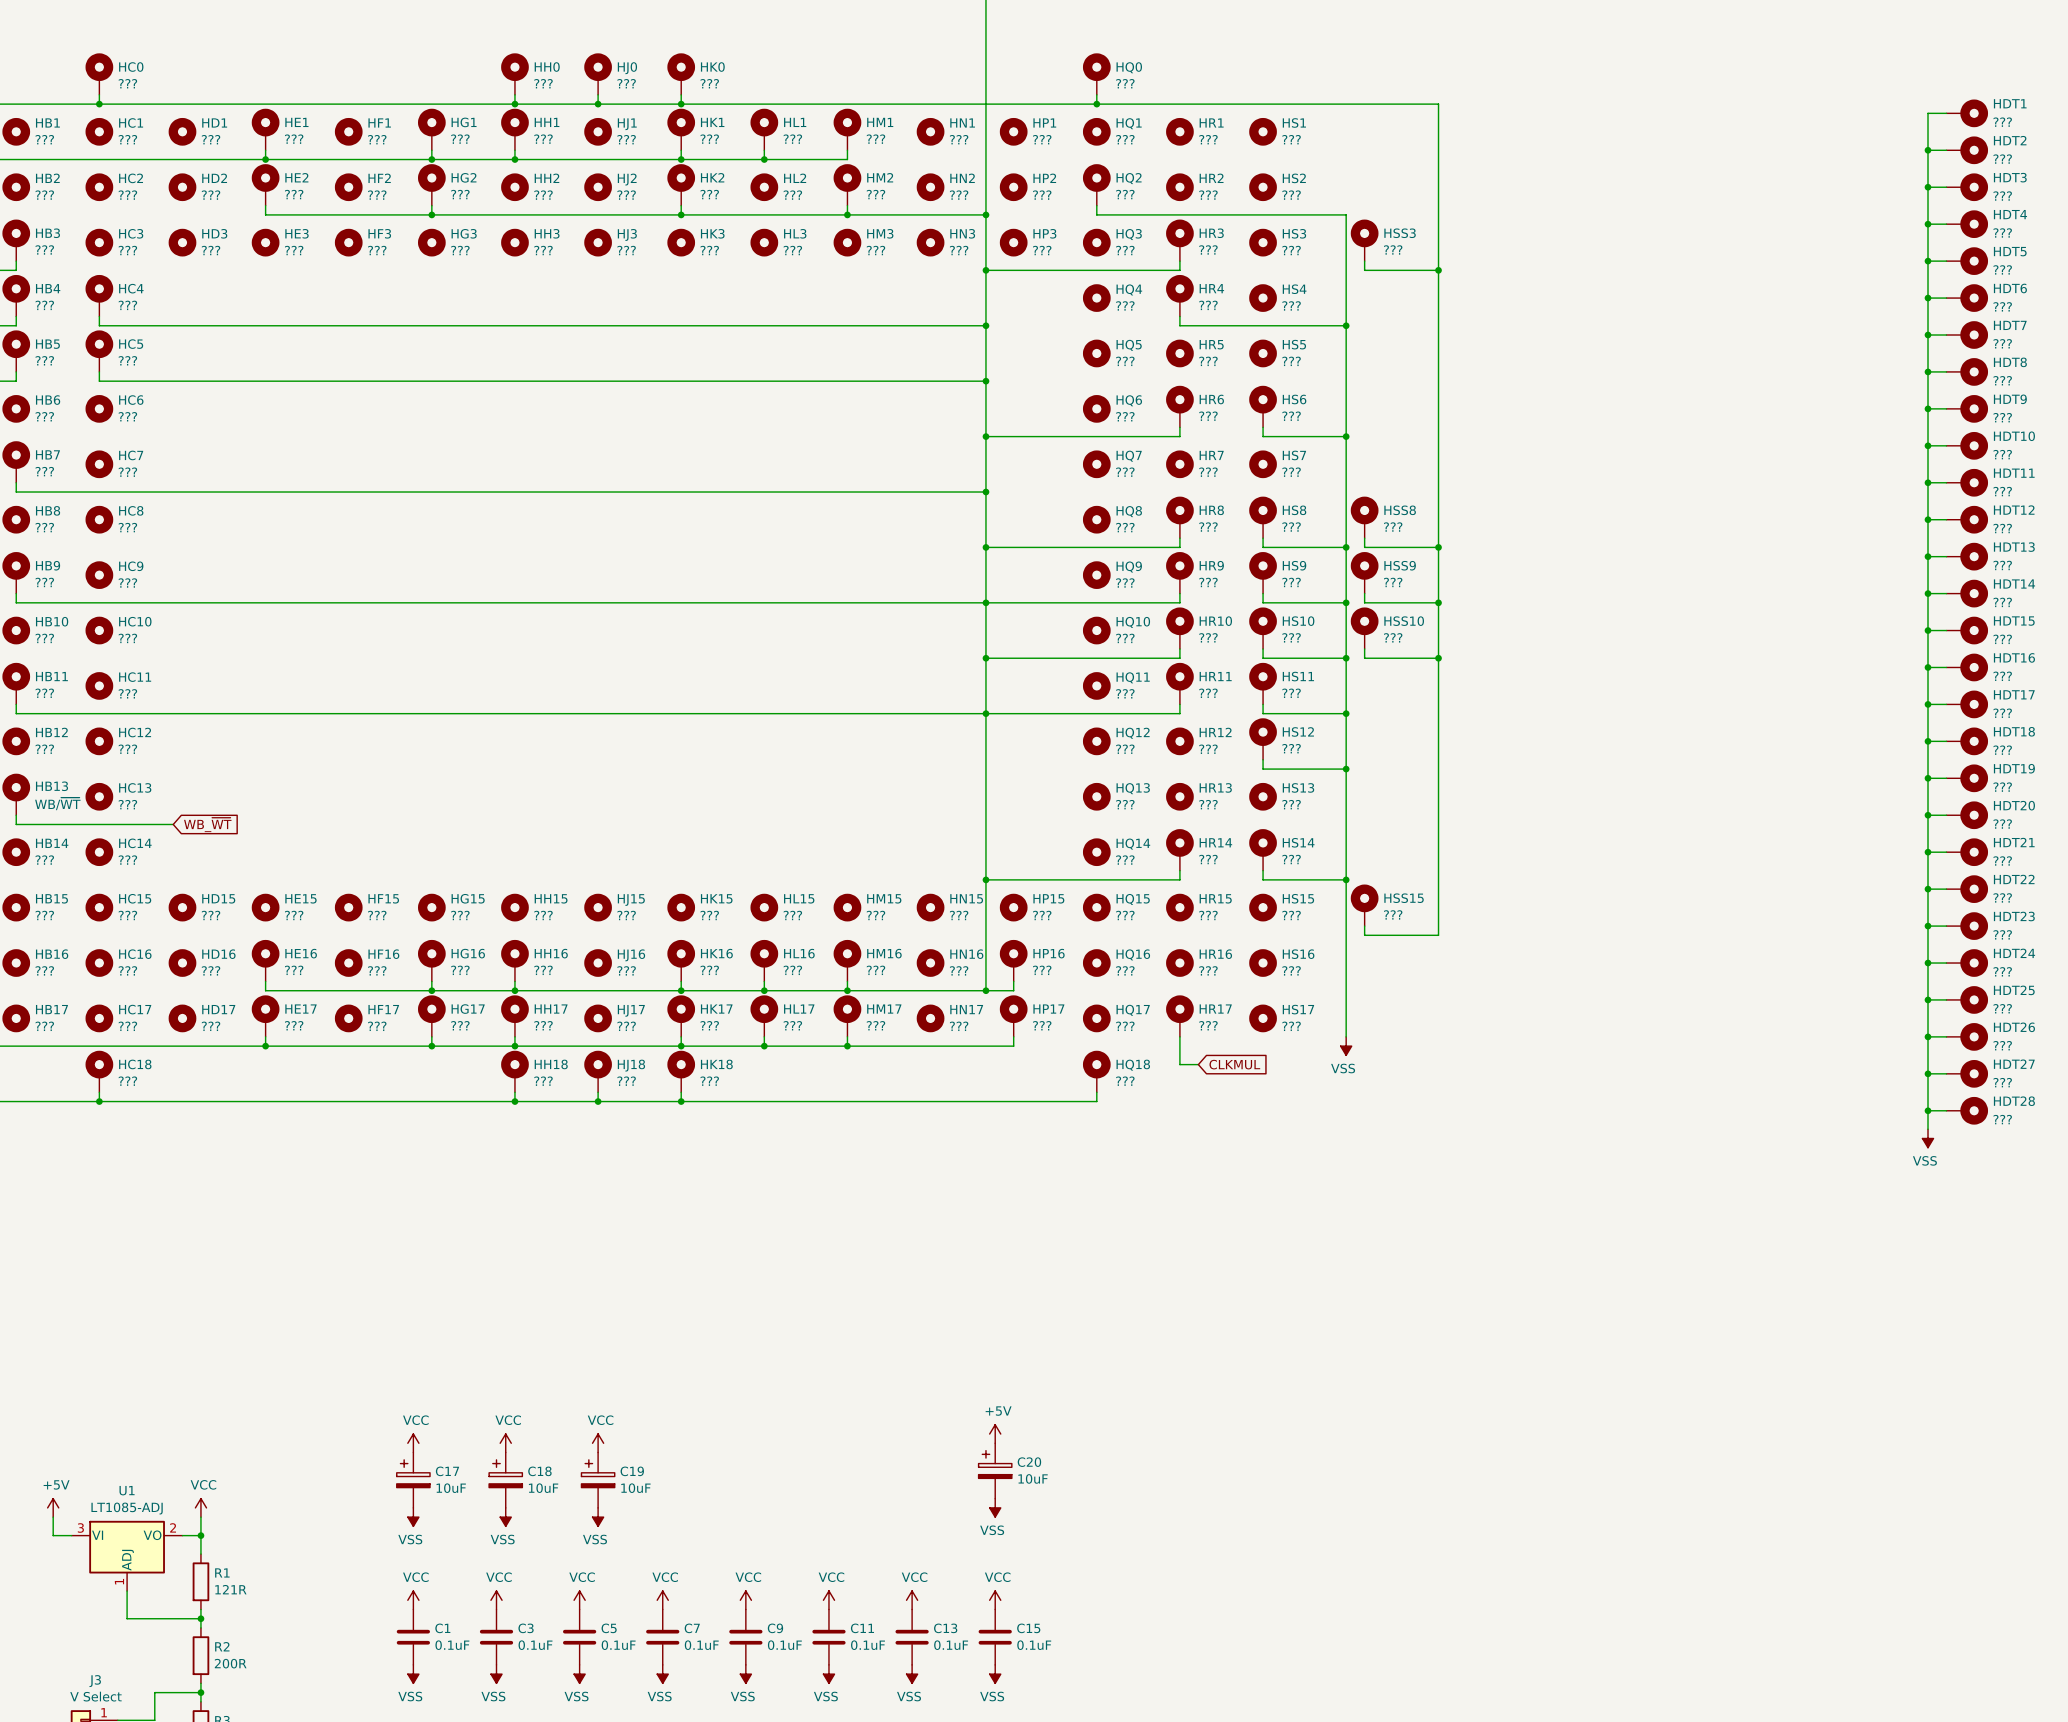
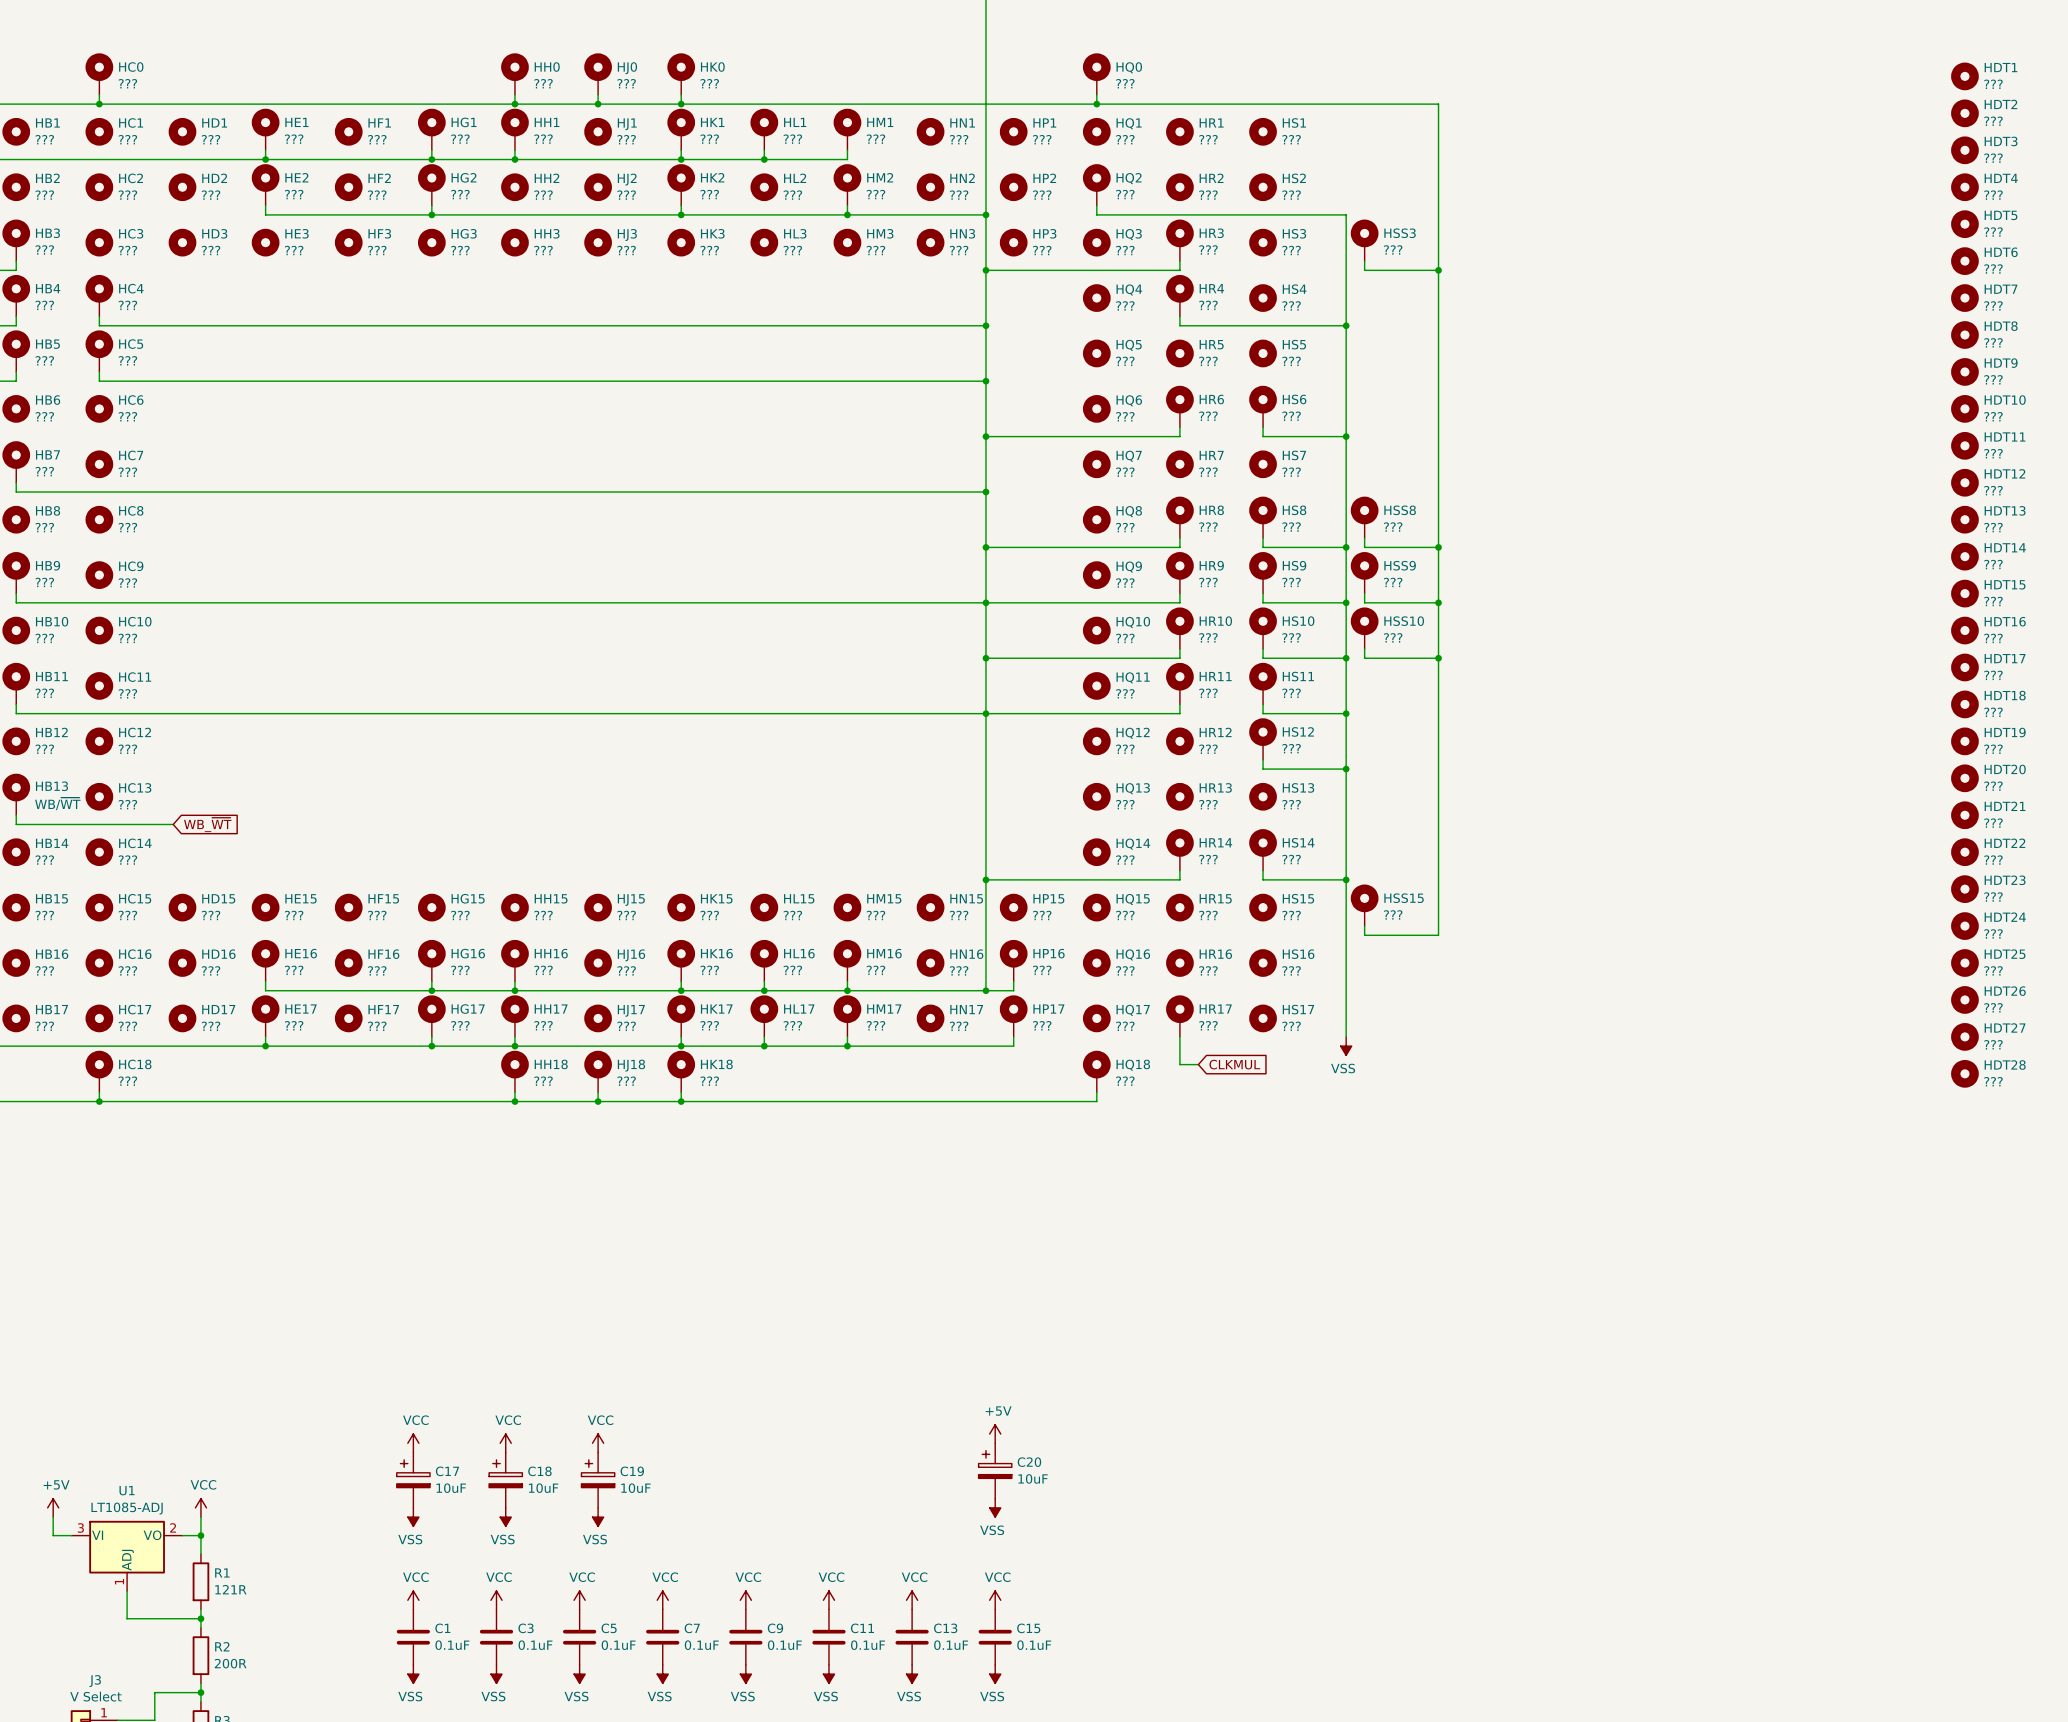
HDT1 symbol: [1946, 99, 1989, 128] -> [1951, 62, 1979, 91]
wire: (1946, 113) (1928, 113) (1928, 1129) -> none
HDT2 symbol: [1946, 136, 1989, 165] -> [1951, 99, 1979, 128]
wire: (1928, 150) (1946, 150) -> none
junction: (1928, 150) -> none
HDT3 symbol: [1946, 173, 1989, 202] -> [1951, 136, 1979, 165]
wire: (1928, 187) (1946, 187) -> none
junction: (1928, 187) -> none
HDT4 symbol: [1946, 210, 1989, 239] -> [1951, 173, 1979, 202]
wire: (1928, 224) (1946, 224) -> none
junction: (1928, 224) -> none
HDT5 symbol: [1946, 247, 1989, 275] -> [1951, 210, 1979, 239]
wire: (1928, 261) (1946, 261) -> none
junction: (1928, 261) -> none
HDT6 symbol: [1946, 284, 1989, 312] -> [1951, 247, 1979, 275]
wire: (1928, 298) (1946, 298) -> none
junction: (1928, 298) -> none
HDT7 symbol: [1946, 321, 1989, 349] -> [1951, 284, 1979, 312]
wire: (1928, 335) (1946, 335) -> none
junction: (1928, 335) -> none
HDT8 symbol: [1946, 358, 1989, 386] -> [1951, 321, 1979, 349]
wire: (1928, 371) (1946, 371) -> none
junction: (1928, 371) -> none
HDT9 symbol: [1946, 395, 1989, 423] -> [1951, 358, 1979, 386]
wire: (1928, 408) (1946, 408) -> none
junction: (1928, 408) -> none
HDT10 symbol: [1946, 431, 1989, 460] -> [1951, 395, 1979, 423]
wire: (1928, 445) (1946, 445) -> none
junction: (1928, 445) -> none
HDT11 symbol: [1946, 468, 1989, 497] -> [1951, 431, 1979, 460]
wire: (1928, 482) (1946, 482) -> none
junction: (1928, 482) -> none
HDT12 symbol: [1946, 505, 1989, 534] -> [1951, 468, 1979, 497]
wire: (1928, 519) (1946, 519) -> none
junction: (1928, 519) -> none
HDT13 symbol: [1946, 542, 1989, 571] -> [1951, 505, 1979, 534]
wire: (1928, 556) (1946, 556) -> none
junction: (1928, 556) -> none
HDT14 symbol: [1946, 579, 1989, 608] -> [1951, 542, 1979, 571]
wire: (1928, 593) (1946, 593) -> none
junction: (1928, 593) -> none
HDT15 symbol: [1946, 616, 1989, 645] -> [1951, 579, 1979, 608]
wire: (1928, 630) (1946, 630) -> none
junction: (1928, 630) -> none
HDT16 symbol: [1946, 653, 1989, 682] -> [1951, 616, 1979, 645]
wire: (1928, 667) (1946, 667) -> none
junction: (1928, 667) -> none
HDT17 symbol: [1946, 690, 1989, 719] -> [1951, 653, 1979, 682]
wire: (1928, 704) (1946, 704) -> none
junction: (1928, 704) -> none
HDT18 symbol: [1946, 727, 1989, 756] -> [1951, 690, 1979, 719]
wire: (1928, 741) (1946, 741) -> none
junction: (1928, 741) -> none
HDT19 symbol: [1946, 764, 1989, 793] -> [1951, 727, 1979, 756]
wire: (1928, 778) (1946, 778) -> none
junction: (1928, 778) -> none
HDT20 symbol: [1946, 801, 1989, 830] -> [1951, 764, 1979, 793]
wire: (1928, 815) (1946, 815) -> none
junction: (1928, 815) -> none
HDT21 symbol: [1946, 838, 1989, 867] -> [1951, 801, 1979, 830]
wire: (1928, 852) (1946, 852) -> none
junction: (1928, 852) -> none
HDT22 symbol: [1946, 875, 1989, 903] -> [1951, 838, 1979, 867]
wire: (1928, 889) (1946, 889) -> none
junction: (1928, 889) -> none
HDT23 symbol: [1946, 912, 1989, 940] -> [1951, 875, 1979, 903]
wire: (1928, 926) (1946, 926) -> none
junction: (1928, 926) -> none
HDT24 symbol: [1946, 949, 1989, 977] -> [1951, 912, 1979, 940]
wire: (1928, 963) (1946, 963) -> none
junction: (1928, 963) -> none
HDT25 symbol: [1946, 986, 1989, 1014] -> [1951, 949, 1979, 977]
wire: (1928, 999) (1946, 999) -> none
junction: (1928, 999) -> none
HDT26 symbol: [1946, 1023, 1989, 1051] -> [1951, 986, 1979, 1014]
wire: (1928, 1036) (1946, 1036) -> none
junction: (1928, 1036) -> none
HDT27 symbol: [1946, 1059, 1989, 1088] -> [1951, 1023, 1979, 1051]
wire: (1928, 1073) (1946, 1073) -> none
junction: (1928, 1073) -> none
HDT28 symbol: [1946, 1096, 1989, 1125] -> [1951, 1059, 1979, 1088]
wire: (1928, 1110) (1946, 1110) -> none
junction: (1928, 1110) -> none
power symbol: VSS (1928, 1138) -> none

